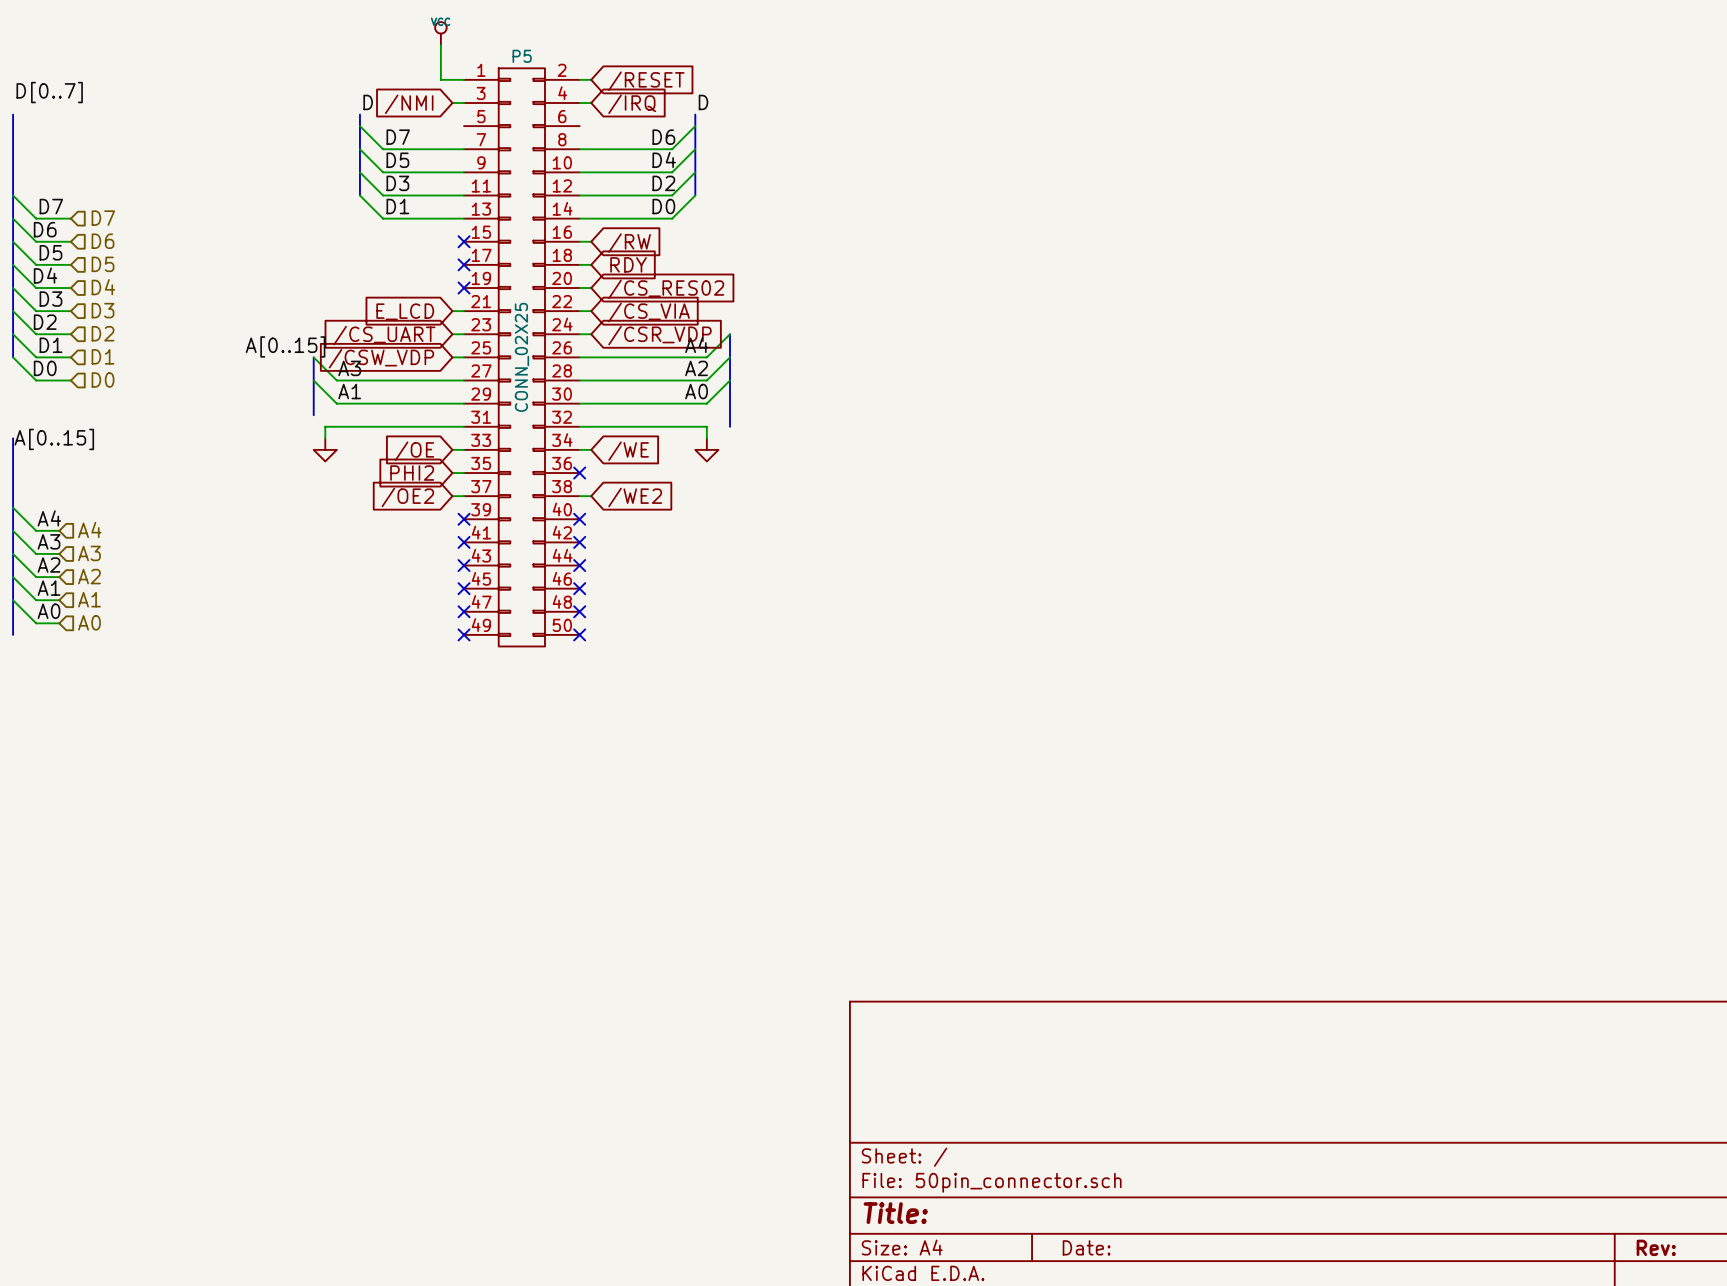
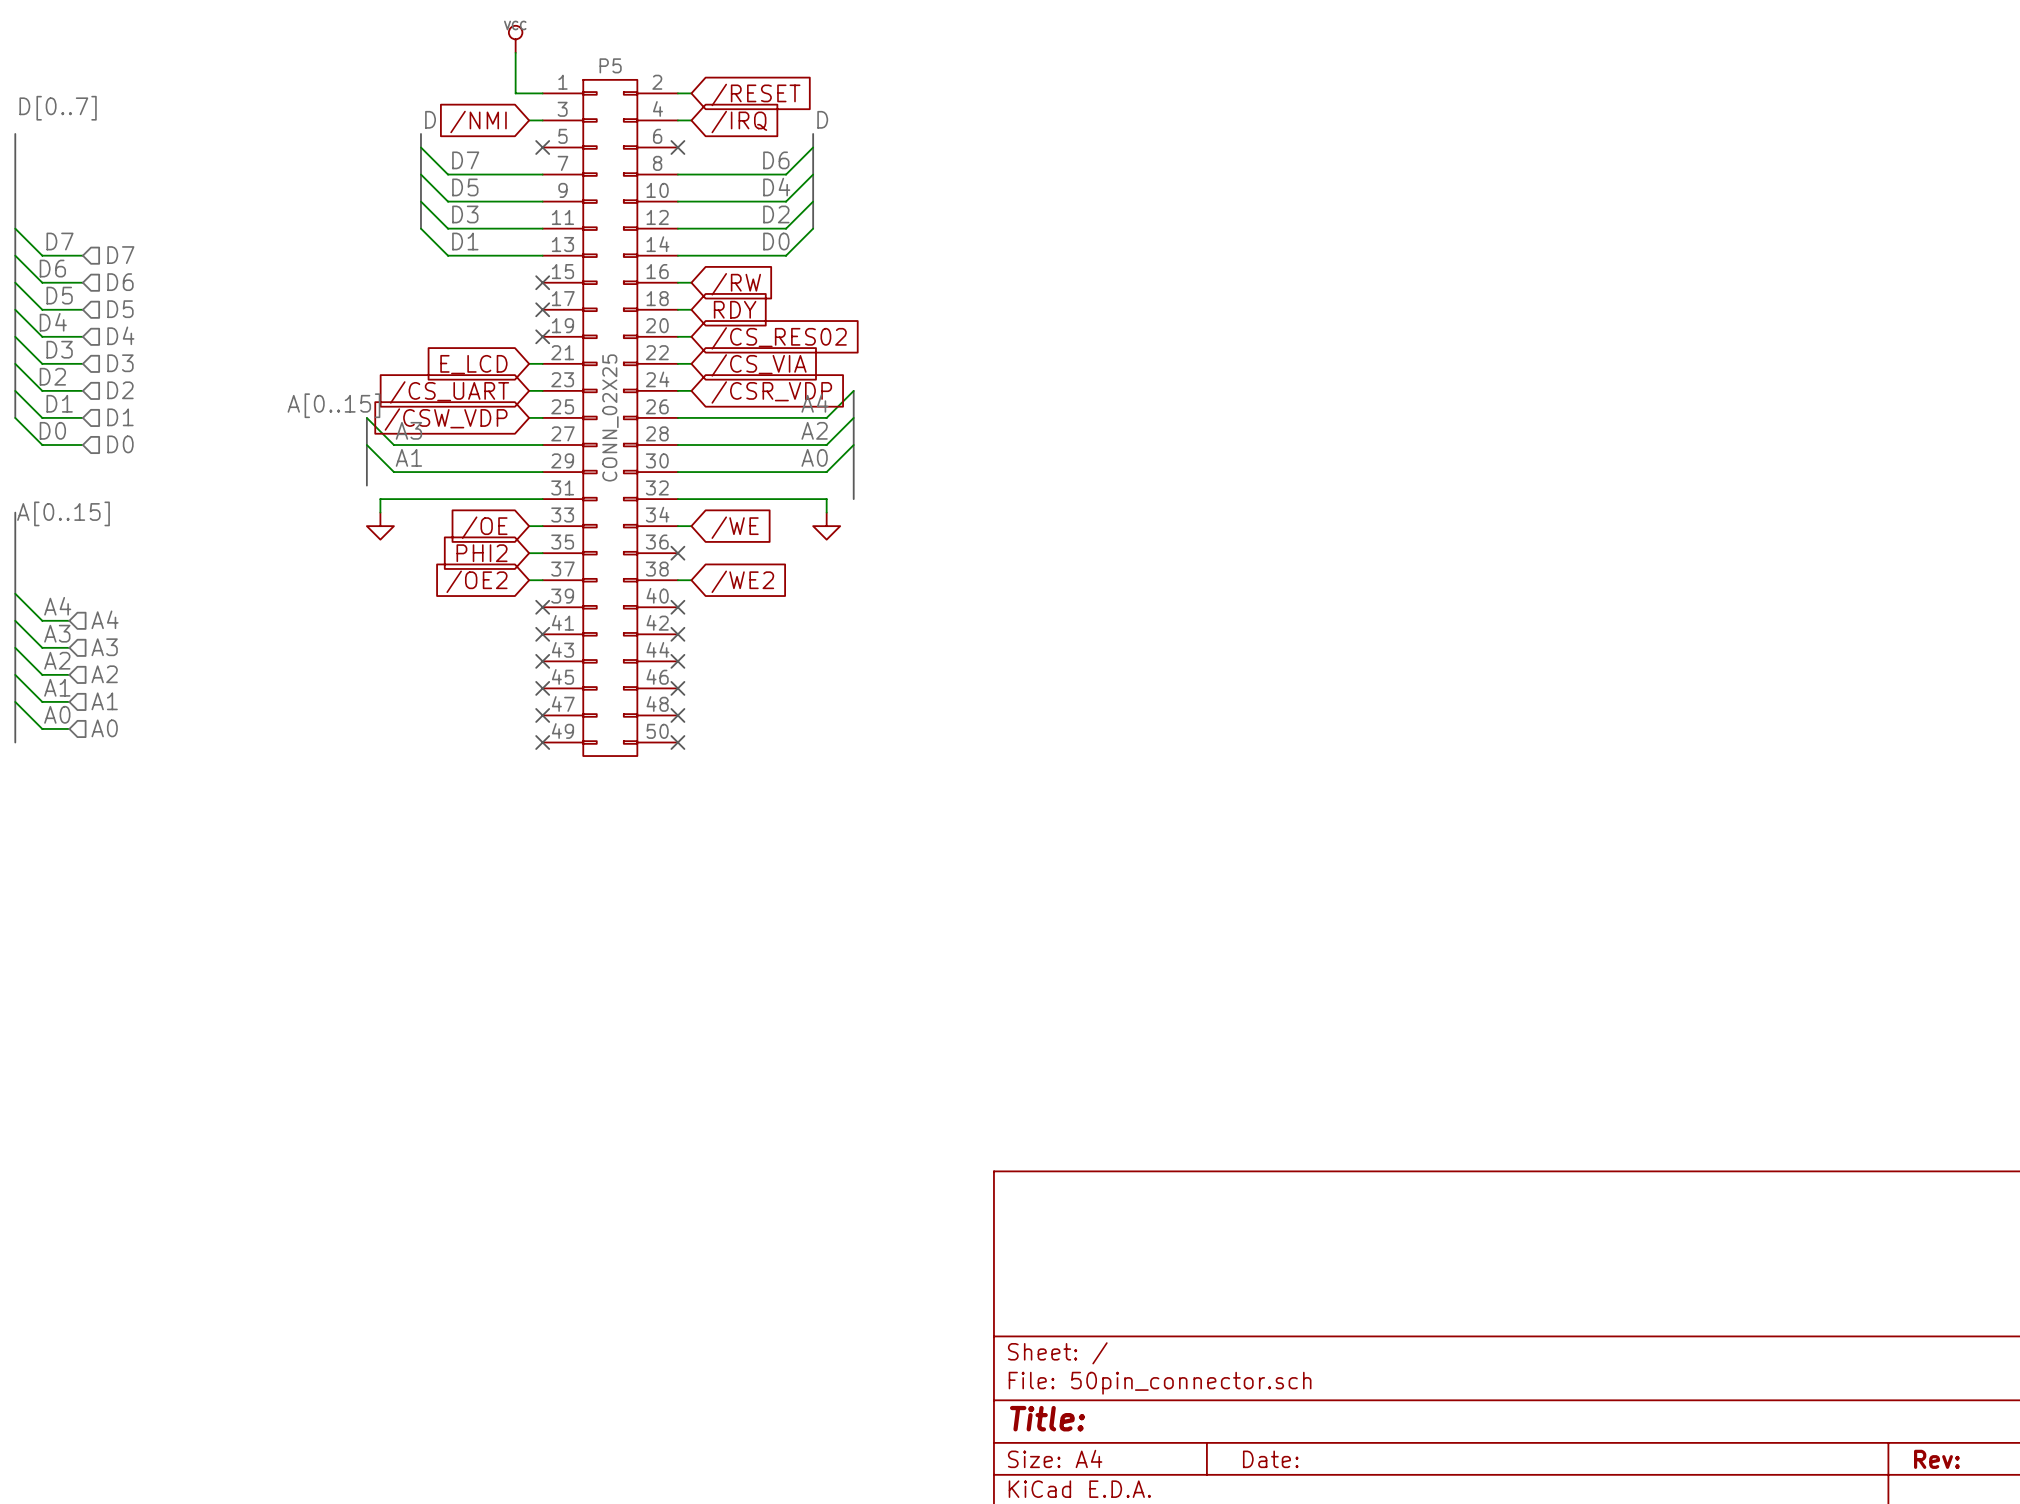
no-connect mark: none -> (542, 147)
no-connect mark: none -> (677, 147)

